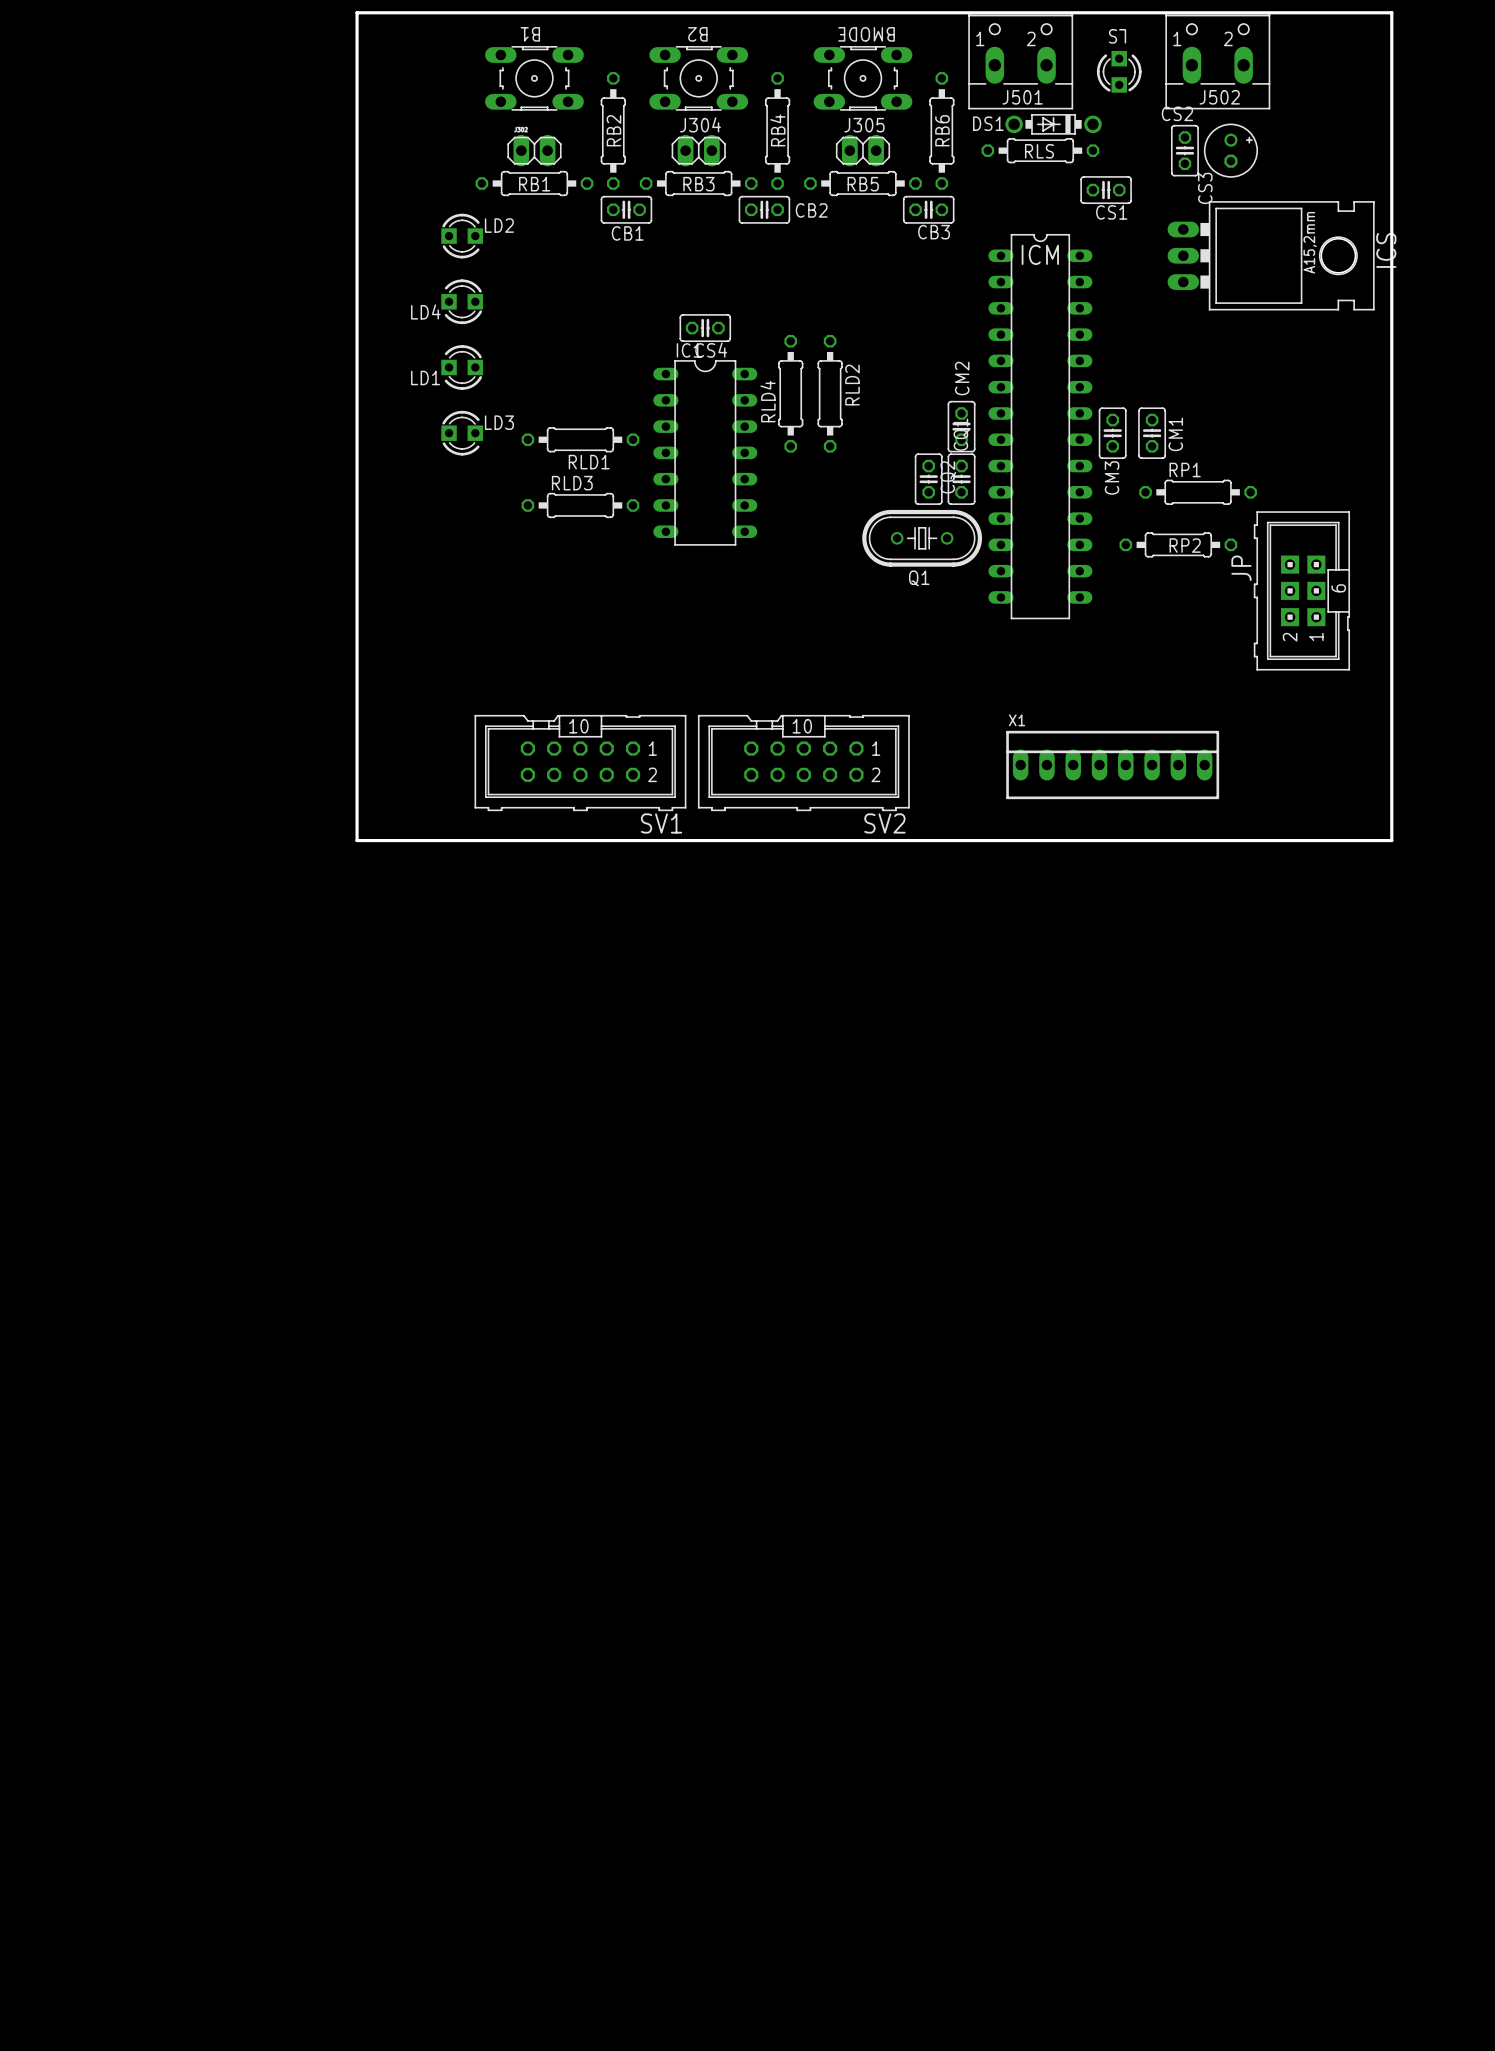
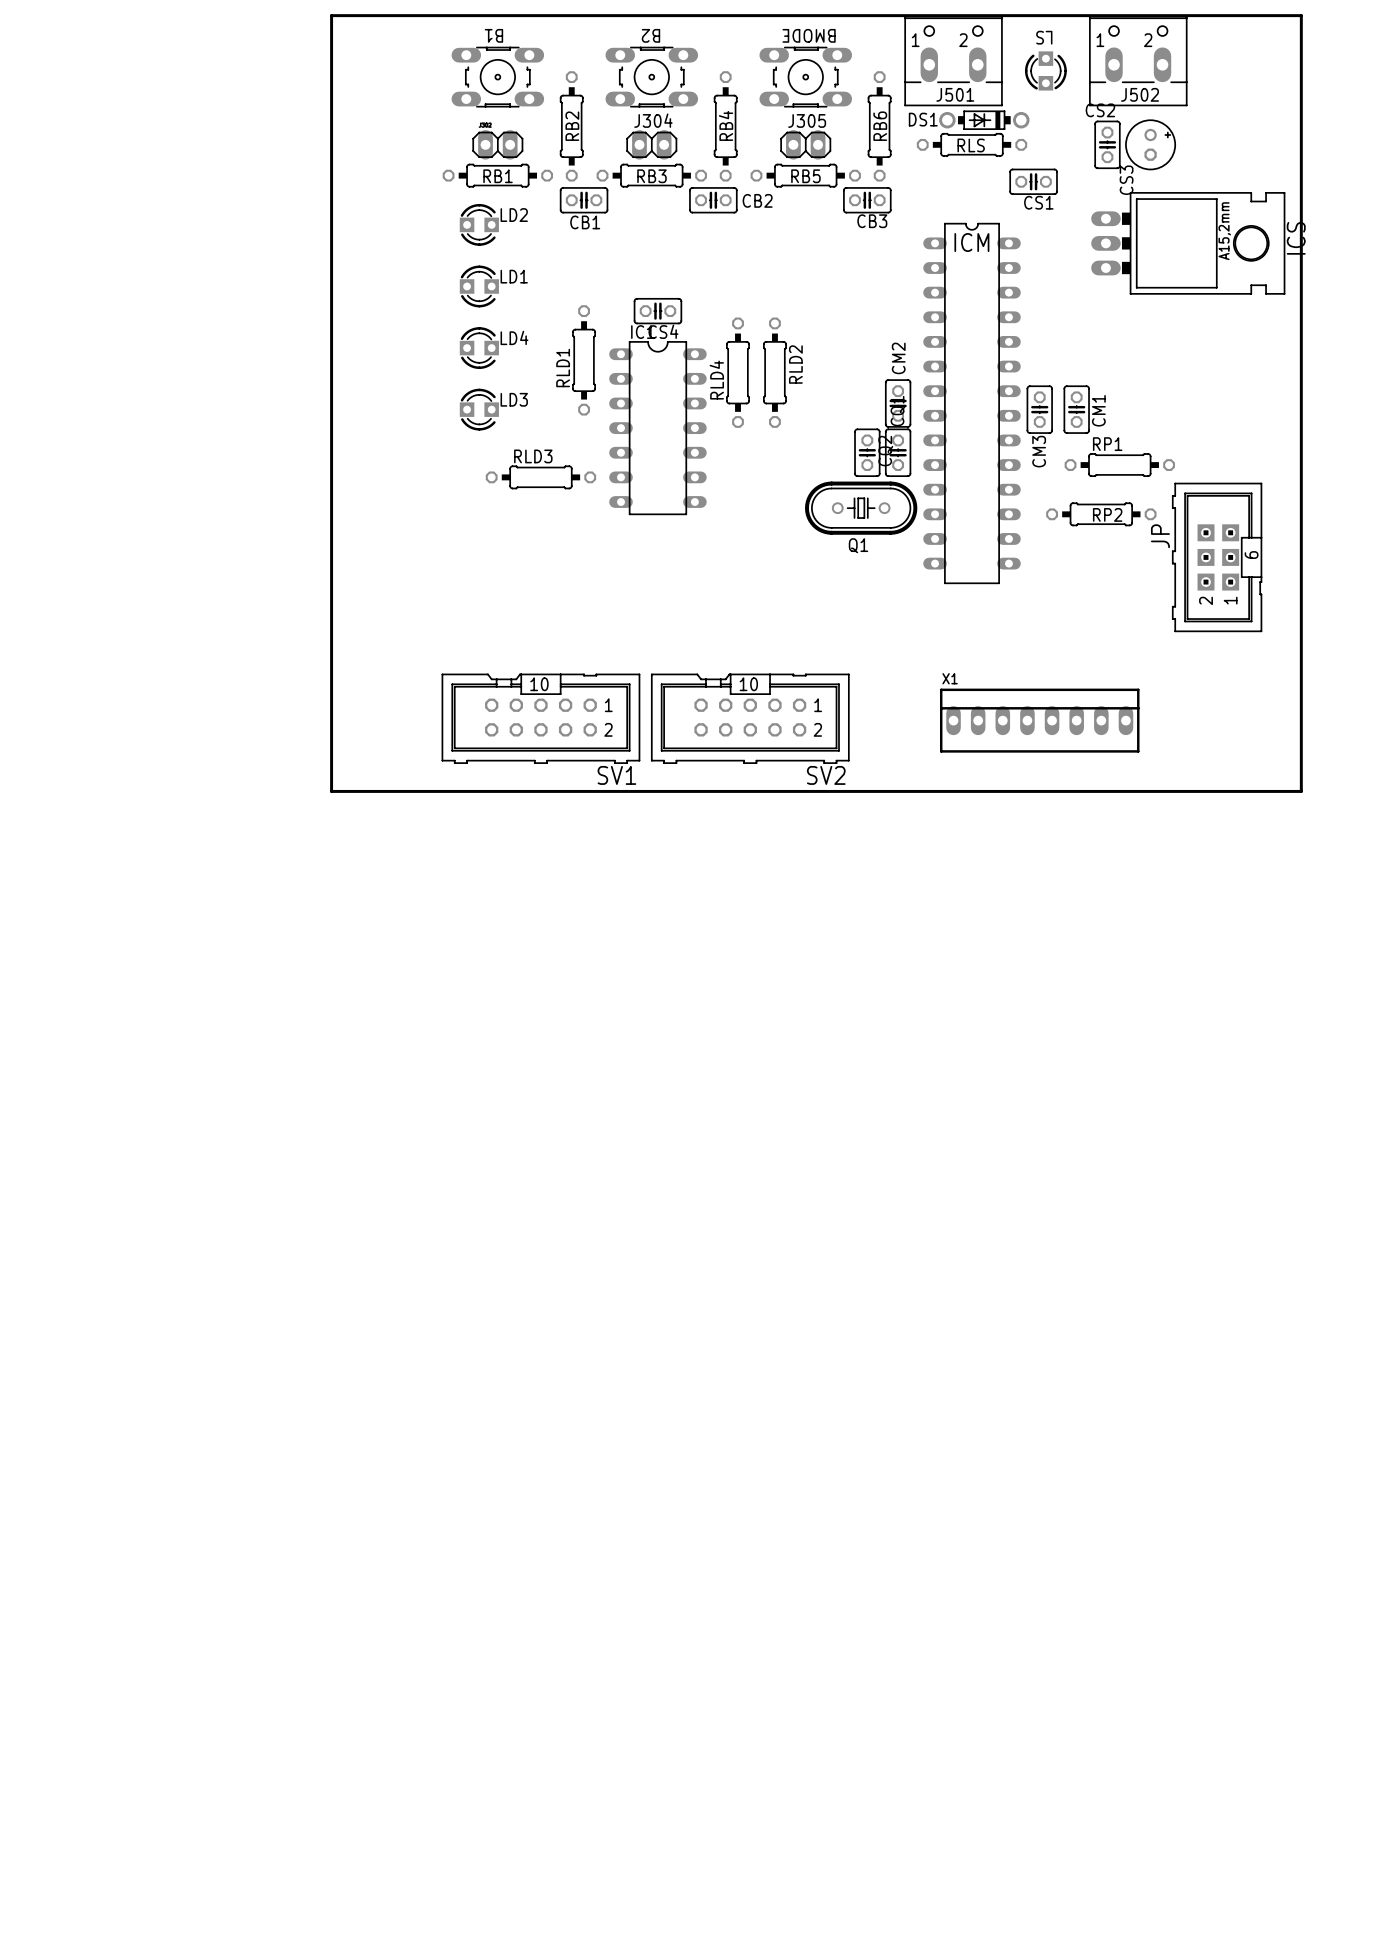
LD2 position: (462, 236) -> (479, 224)
LD4 rotation: 0° (462, 301) -> 180° (479, 348)
LD4 position: (462, 301) -> (479, 348)
LD1 rotation: 0° (462, 367) -> 180° (479, 286)
LD1 position: (462, 367) -> (479, 286)
LD3 position: (462, 433) -> (479, 409)
RLD1 rotation: 0° (580, 439) -> 90° clockwise (584, 360)
RLD1 position: (580, 439) -> (584, 360)

